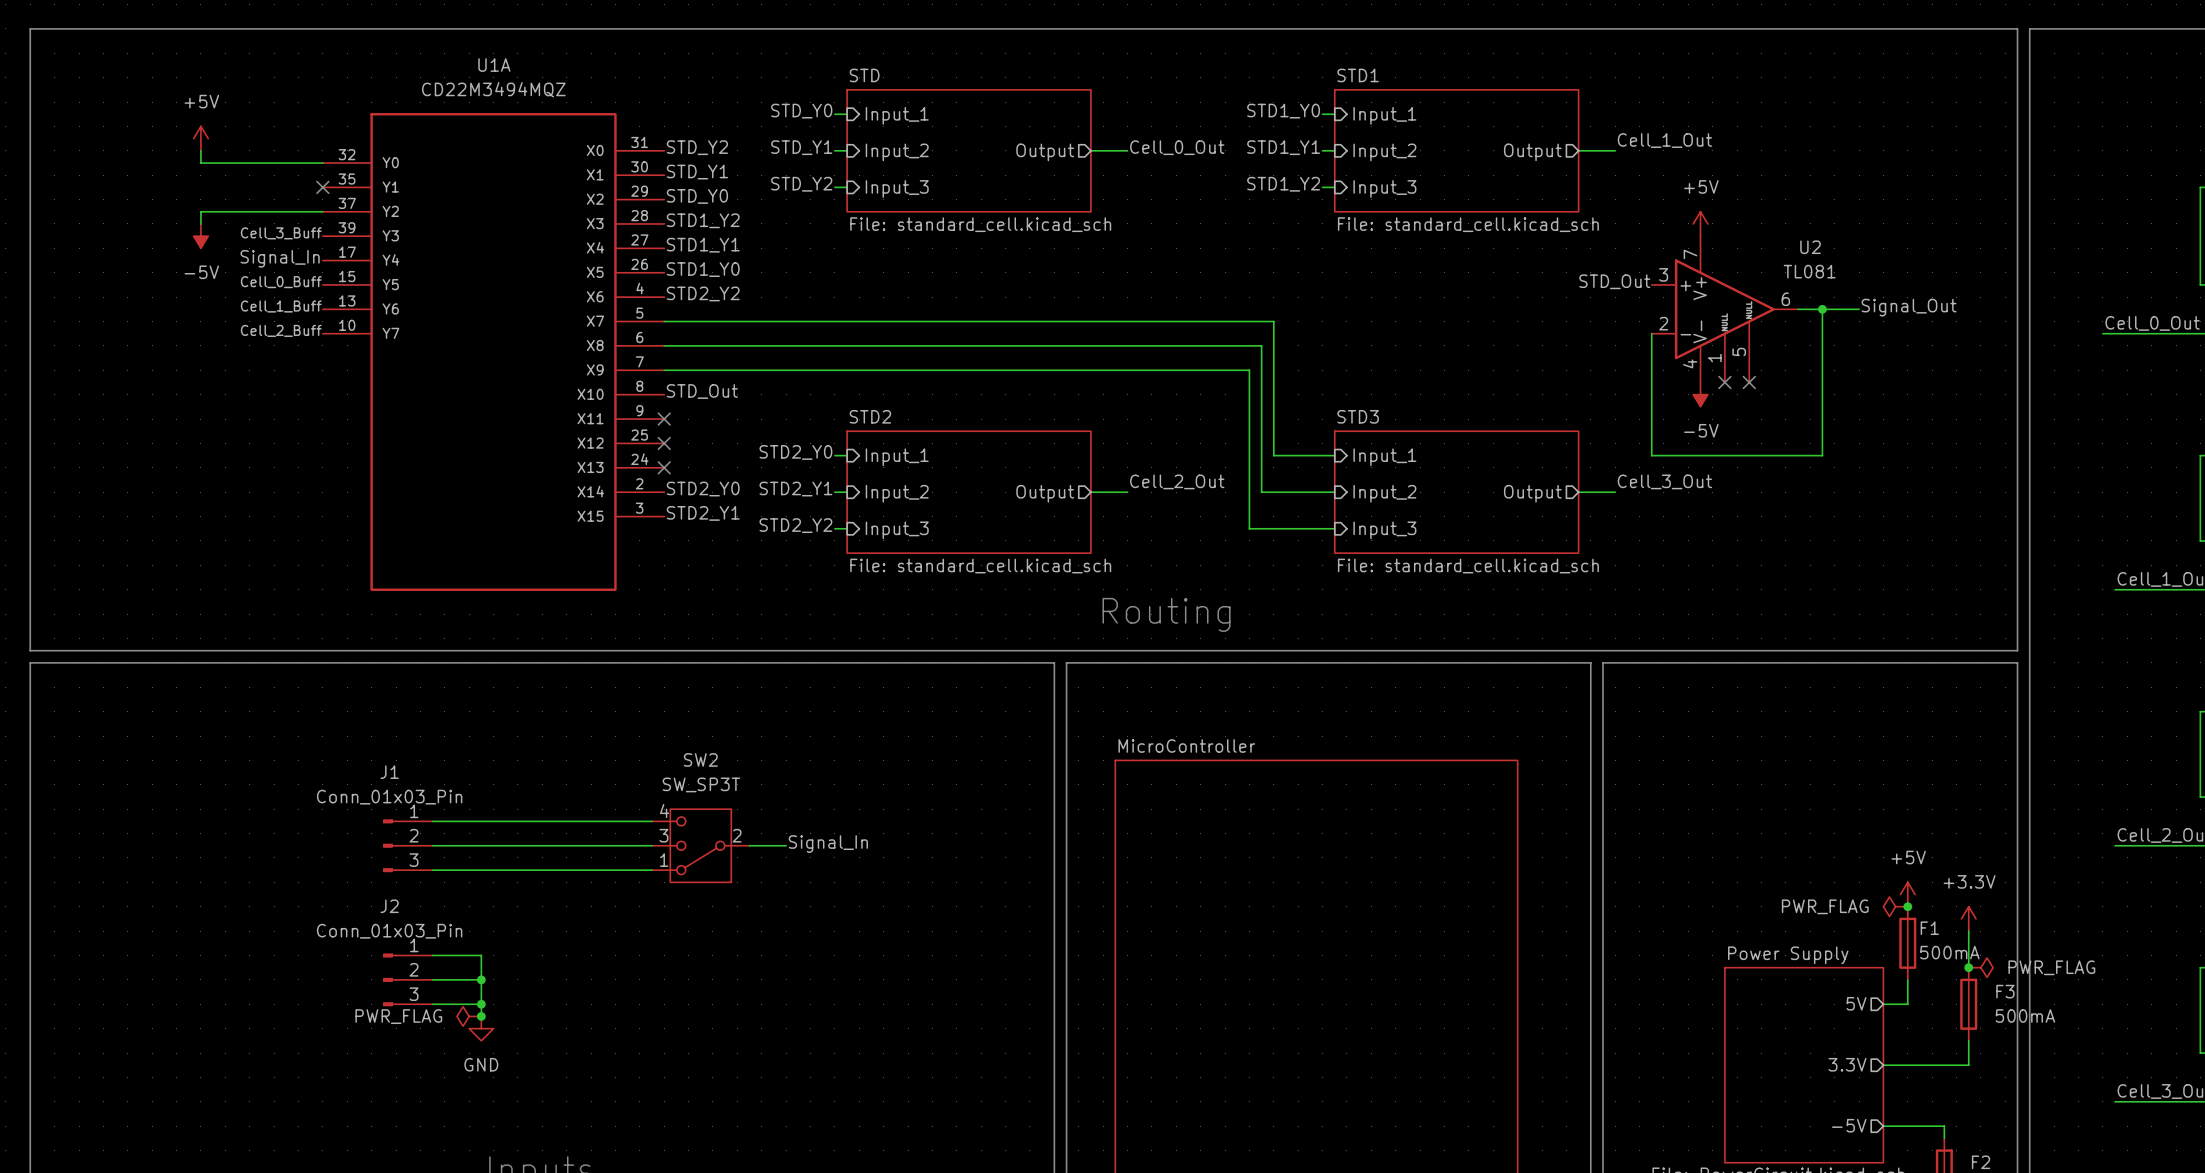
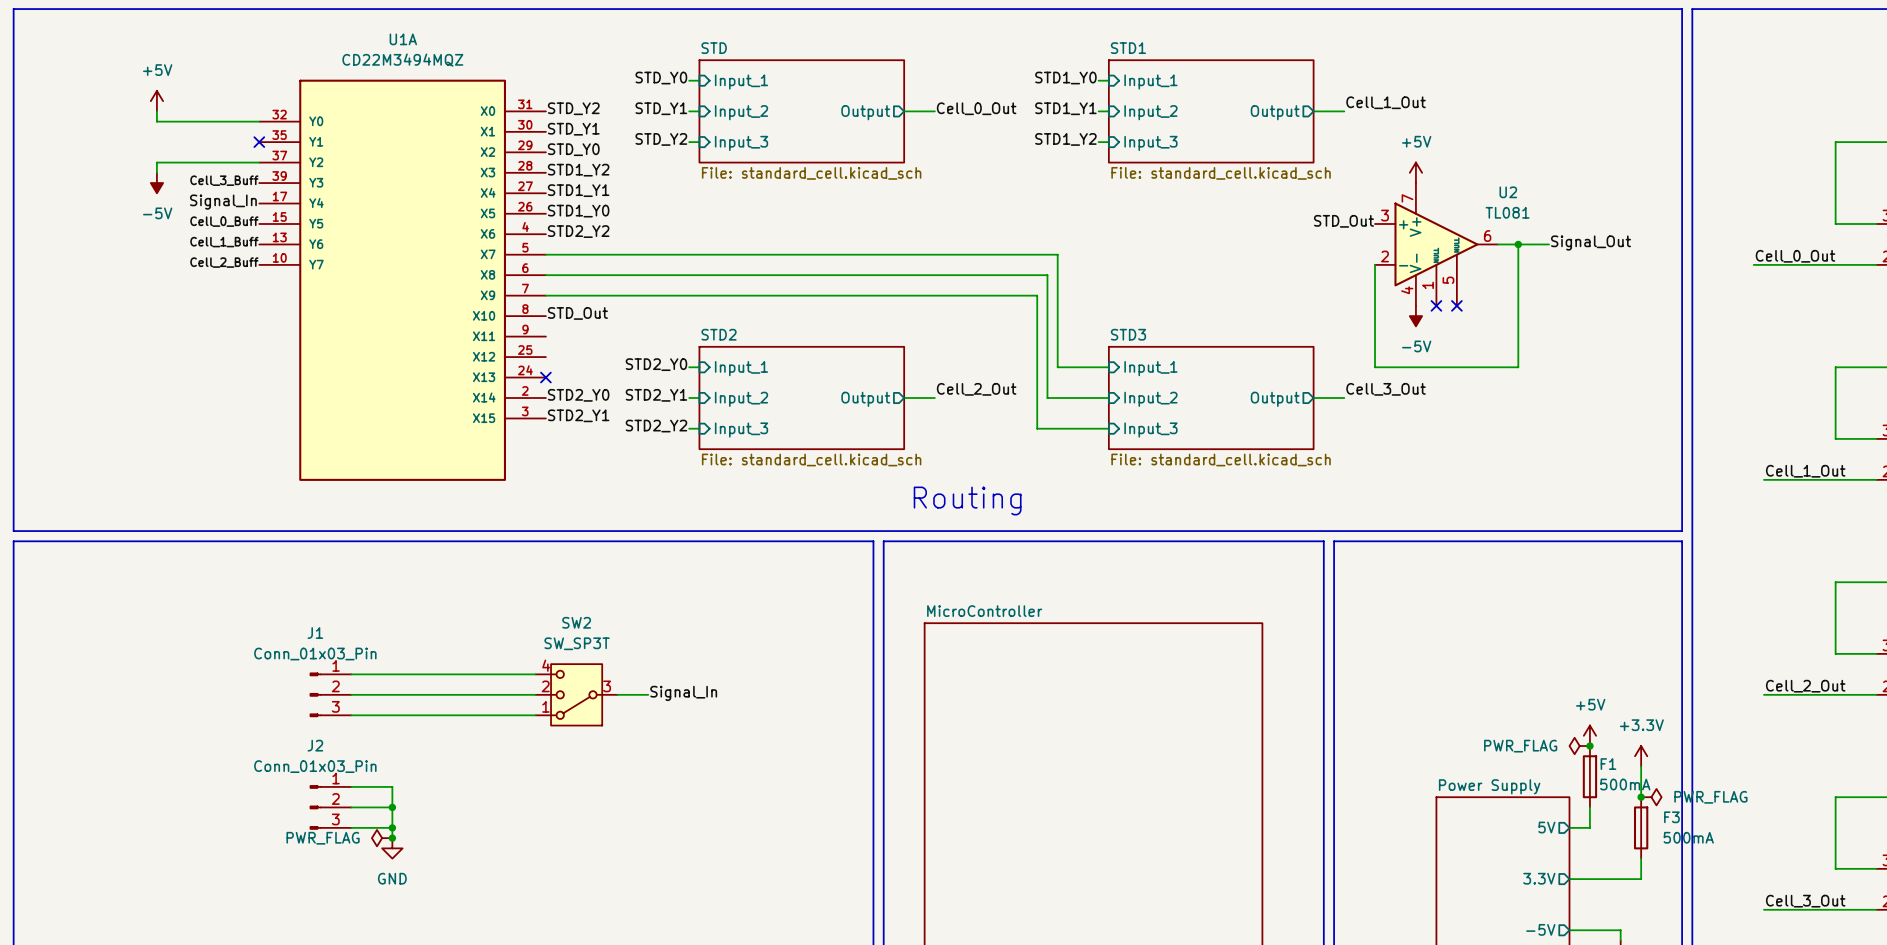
no-connect mark: (664, 419) -> none
no-connect mark: (664, 443) -> none
SW2 pin number: 3 (663, 835) -> 2 (545, 686)
SW2 pin number: 2 (737, 835) -> 3 (607, 686)

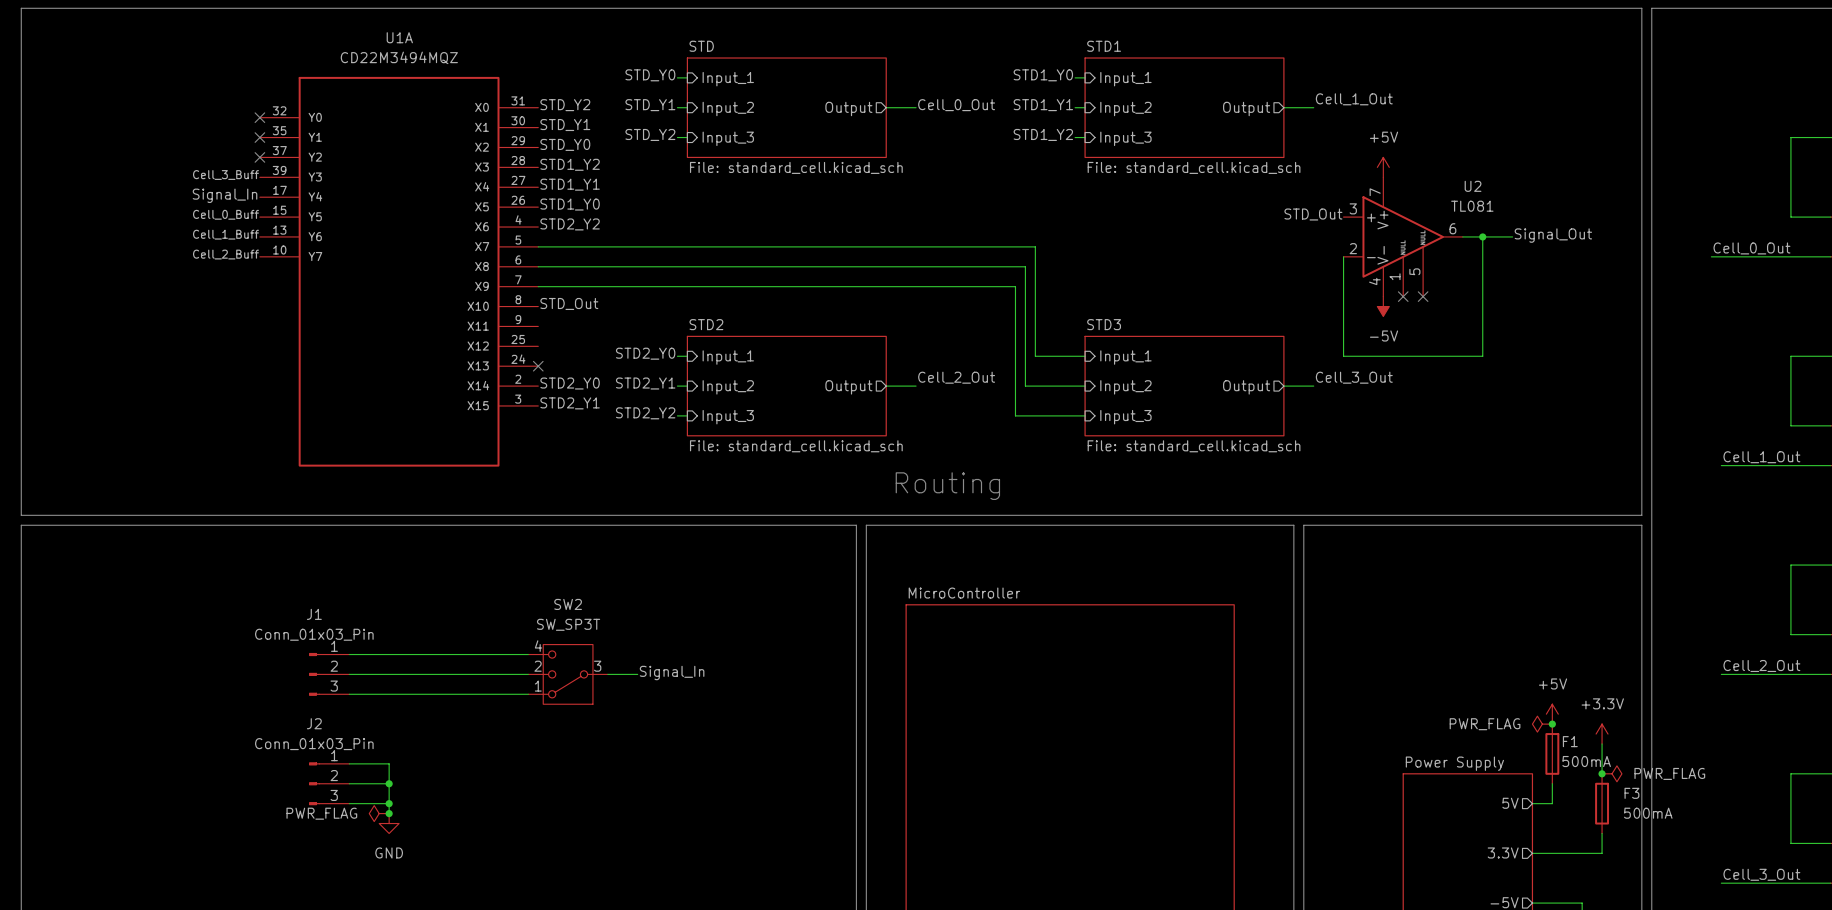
power symbol: +5V (156, 101) -> none
wire: (156, 111) (156, 121) (259, 121) -> none
no-connect mark: none -> (259, 117)
wire: (259, 162) (156, 162) (156, 172) -> none
no-connect mark: none -> (259, 157)
power symbol: -5V (156, 183) -> none

